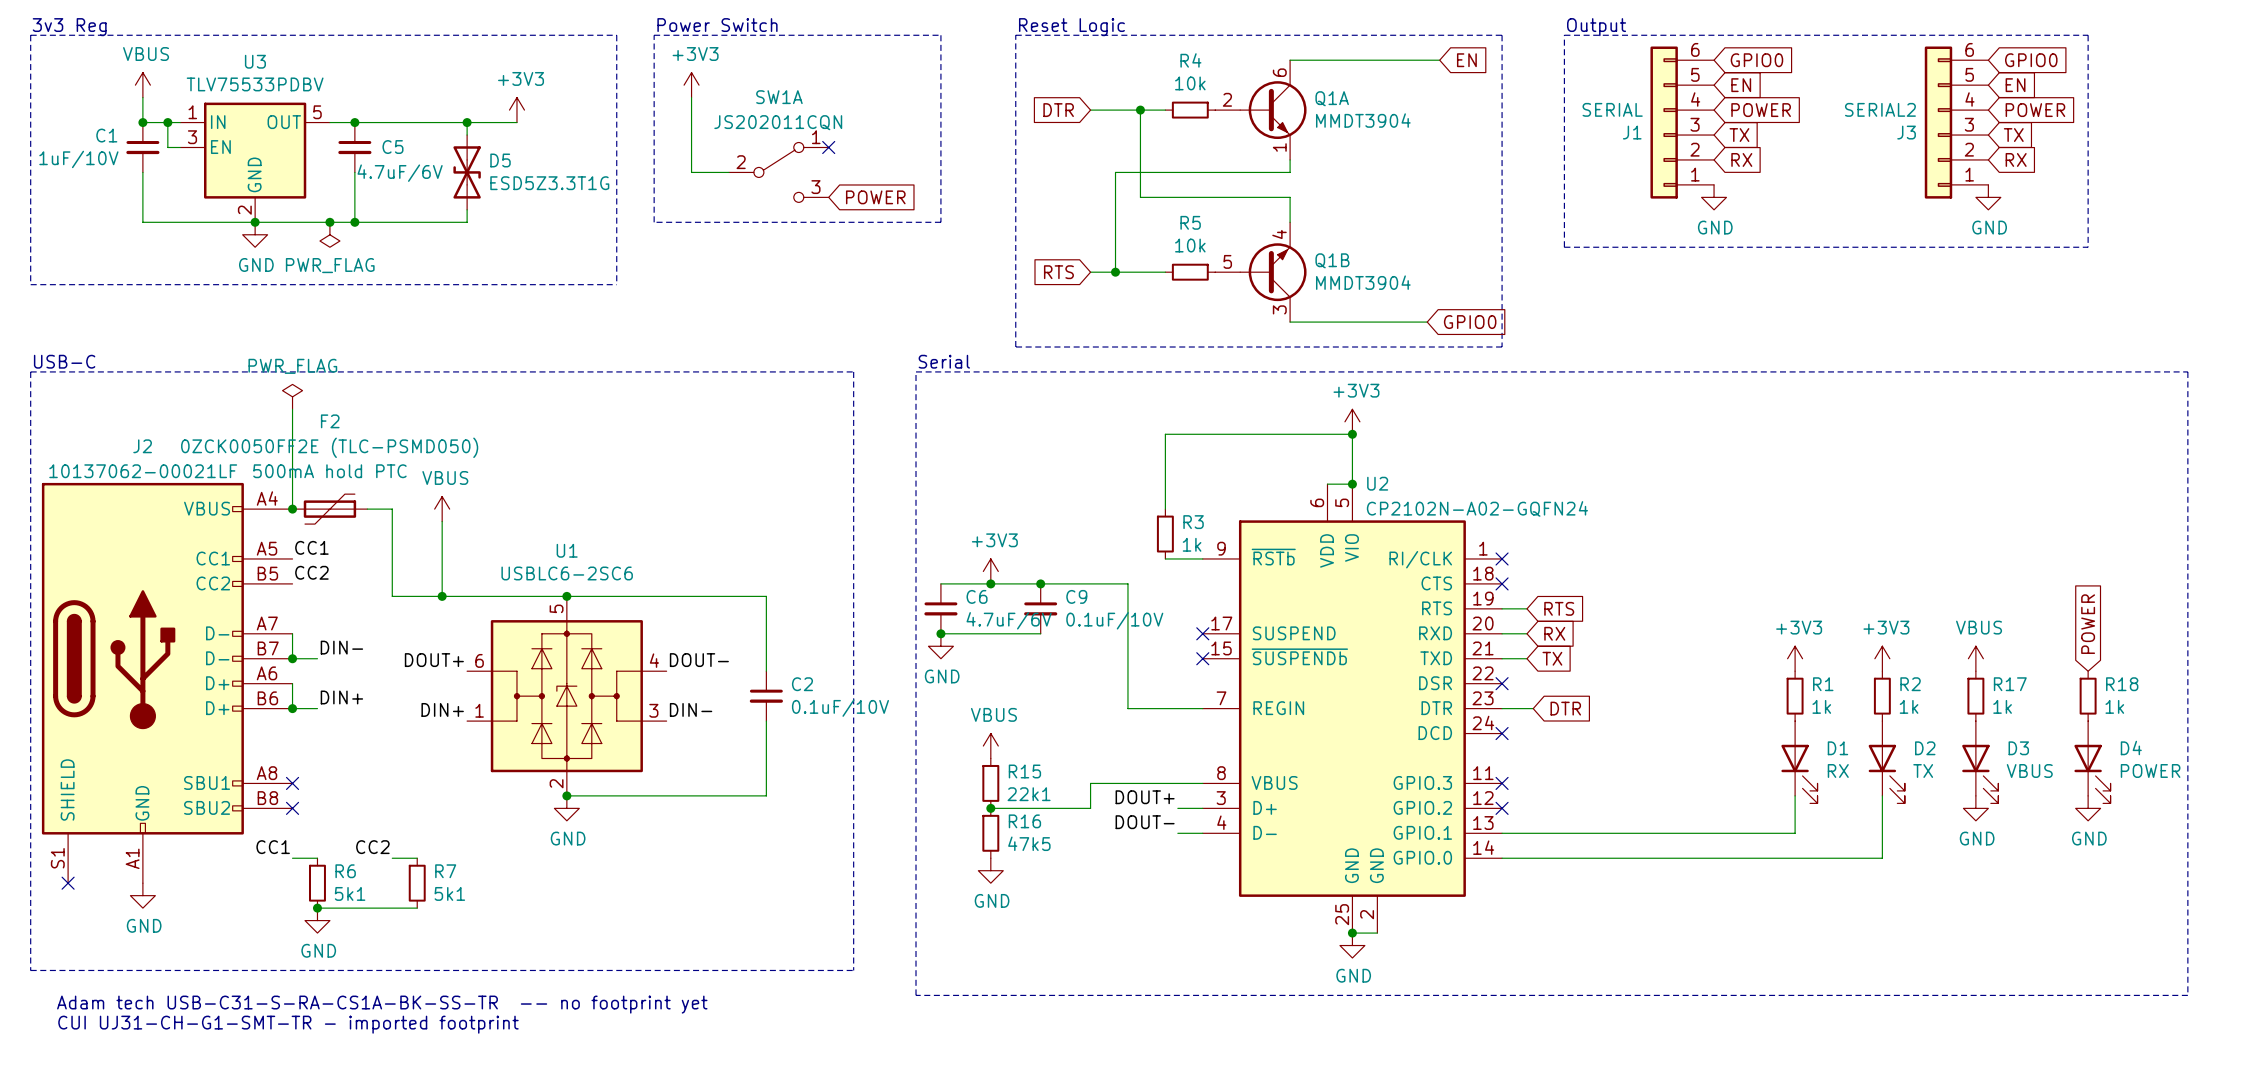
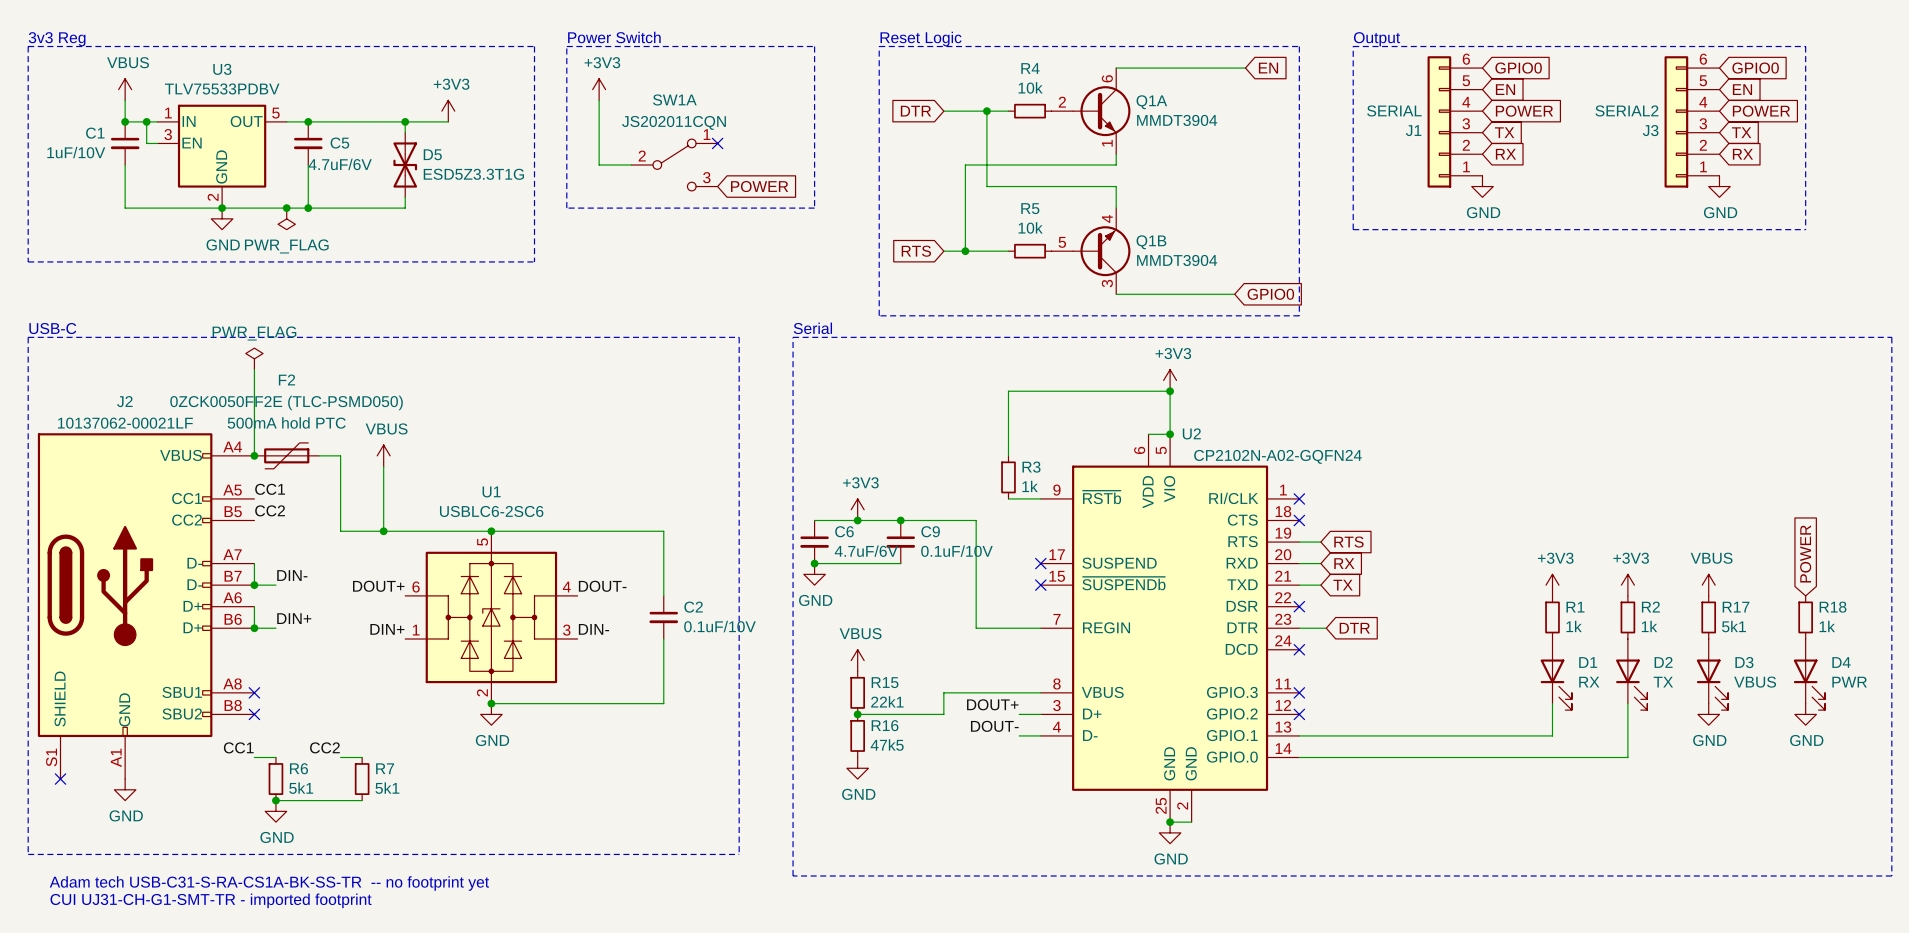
R17 value: 1k (2002, 706) -> 5k1 (1733, 626)
D4 value: POWER (2150, 770) -> PWR (1849, 682)

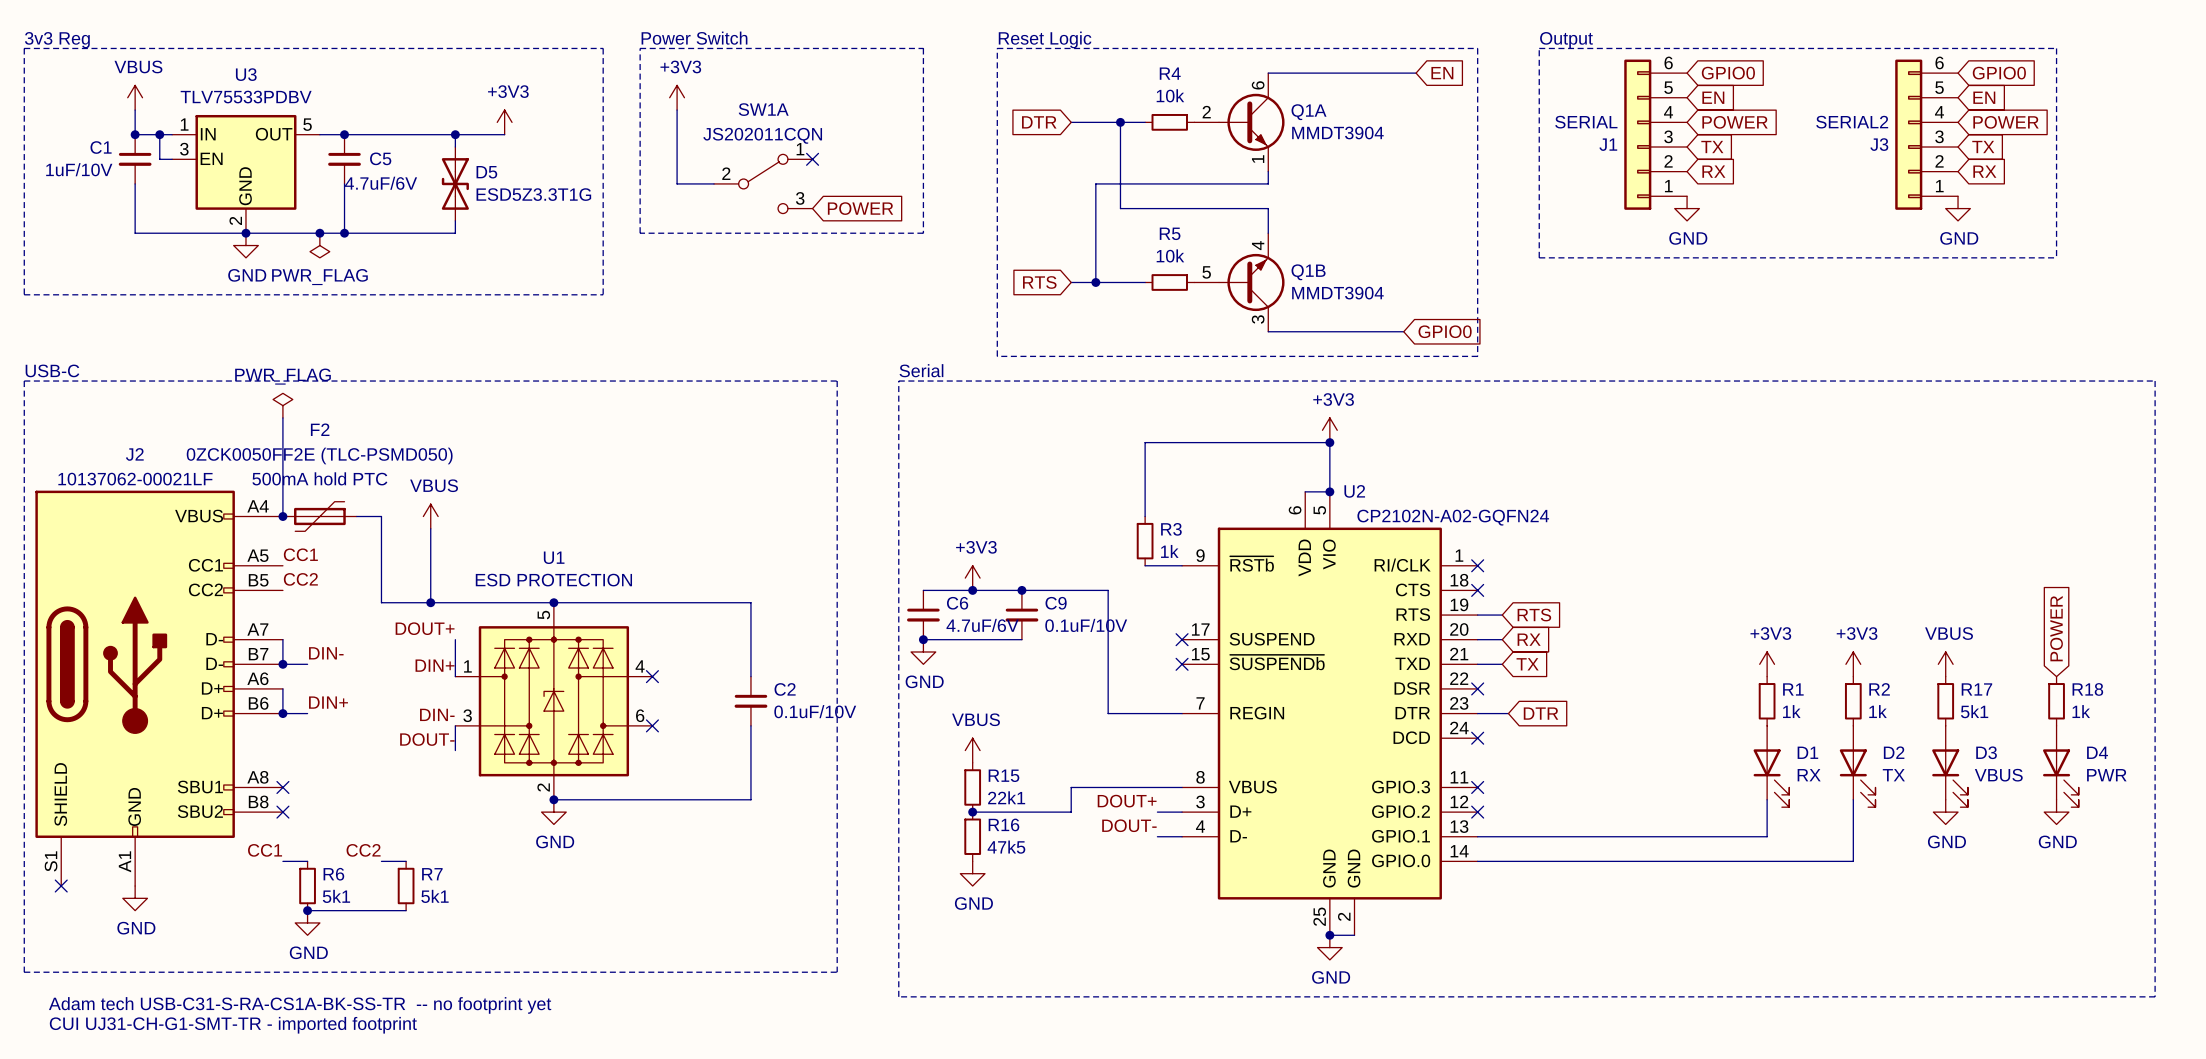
U1 value: USBLC6-2SC6 (491, 511) -> ESD PROTECTION (553, 580)
U1 symbol: [405, 531, 578, 704] -> [455, 602, 653, 800]
label: none -> DOUT+ (425, 628)
wire: none -> (455, 639) (455, 676)
label: DOUT+ (378, 586) -> DIN+ (435, 665)
label position: DOUT- (602, 586) -> DOUT- (427, 739)
no-connect mark: none -> (652, 676)
label: DIN+ (387, 629) -> DIN- (437, 714)
label: DIN- (593, 629) -> none
wire: none -> (455, 725) (455, 750)
no-connect mark: none -> (652, 725)

